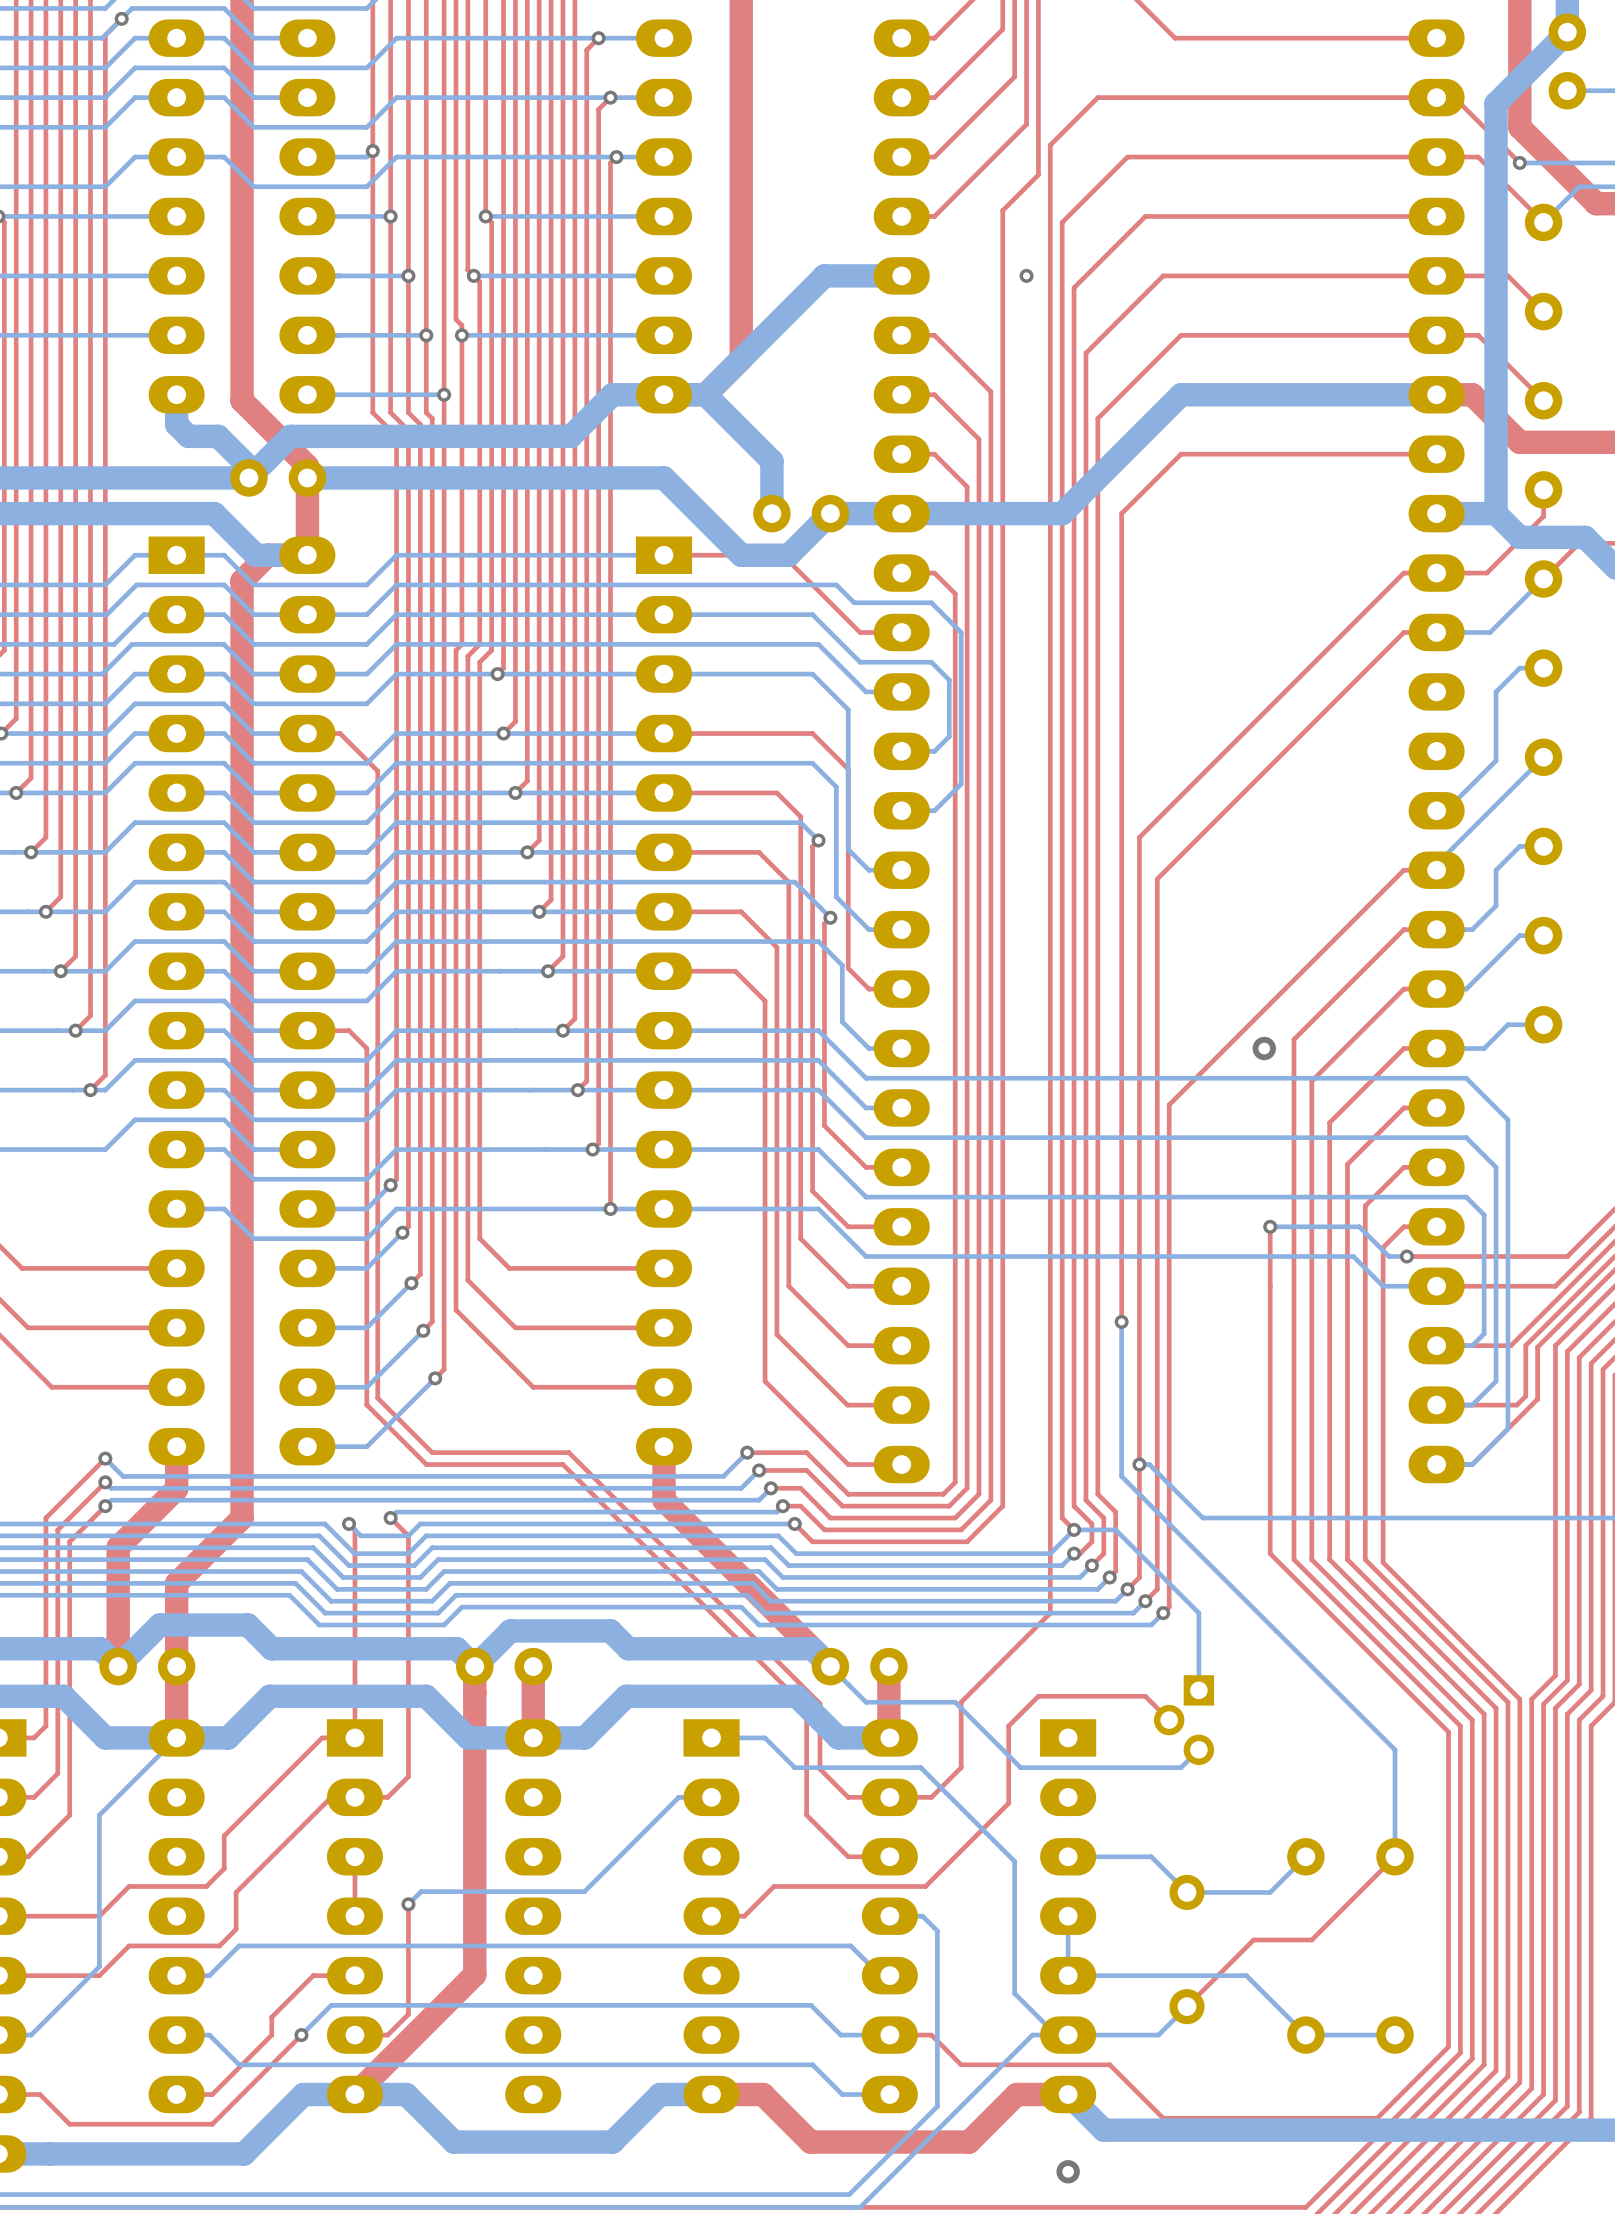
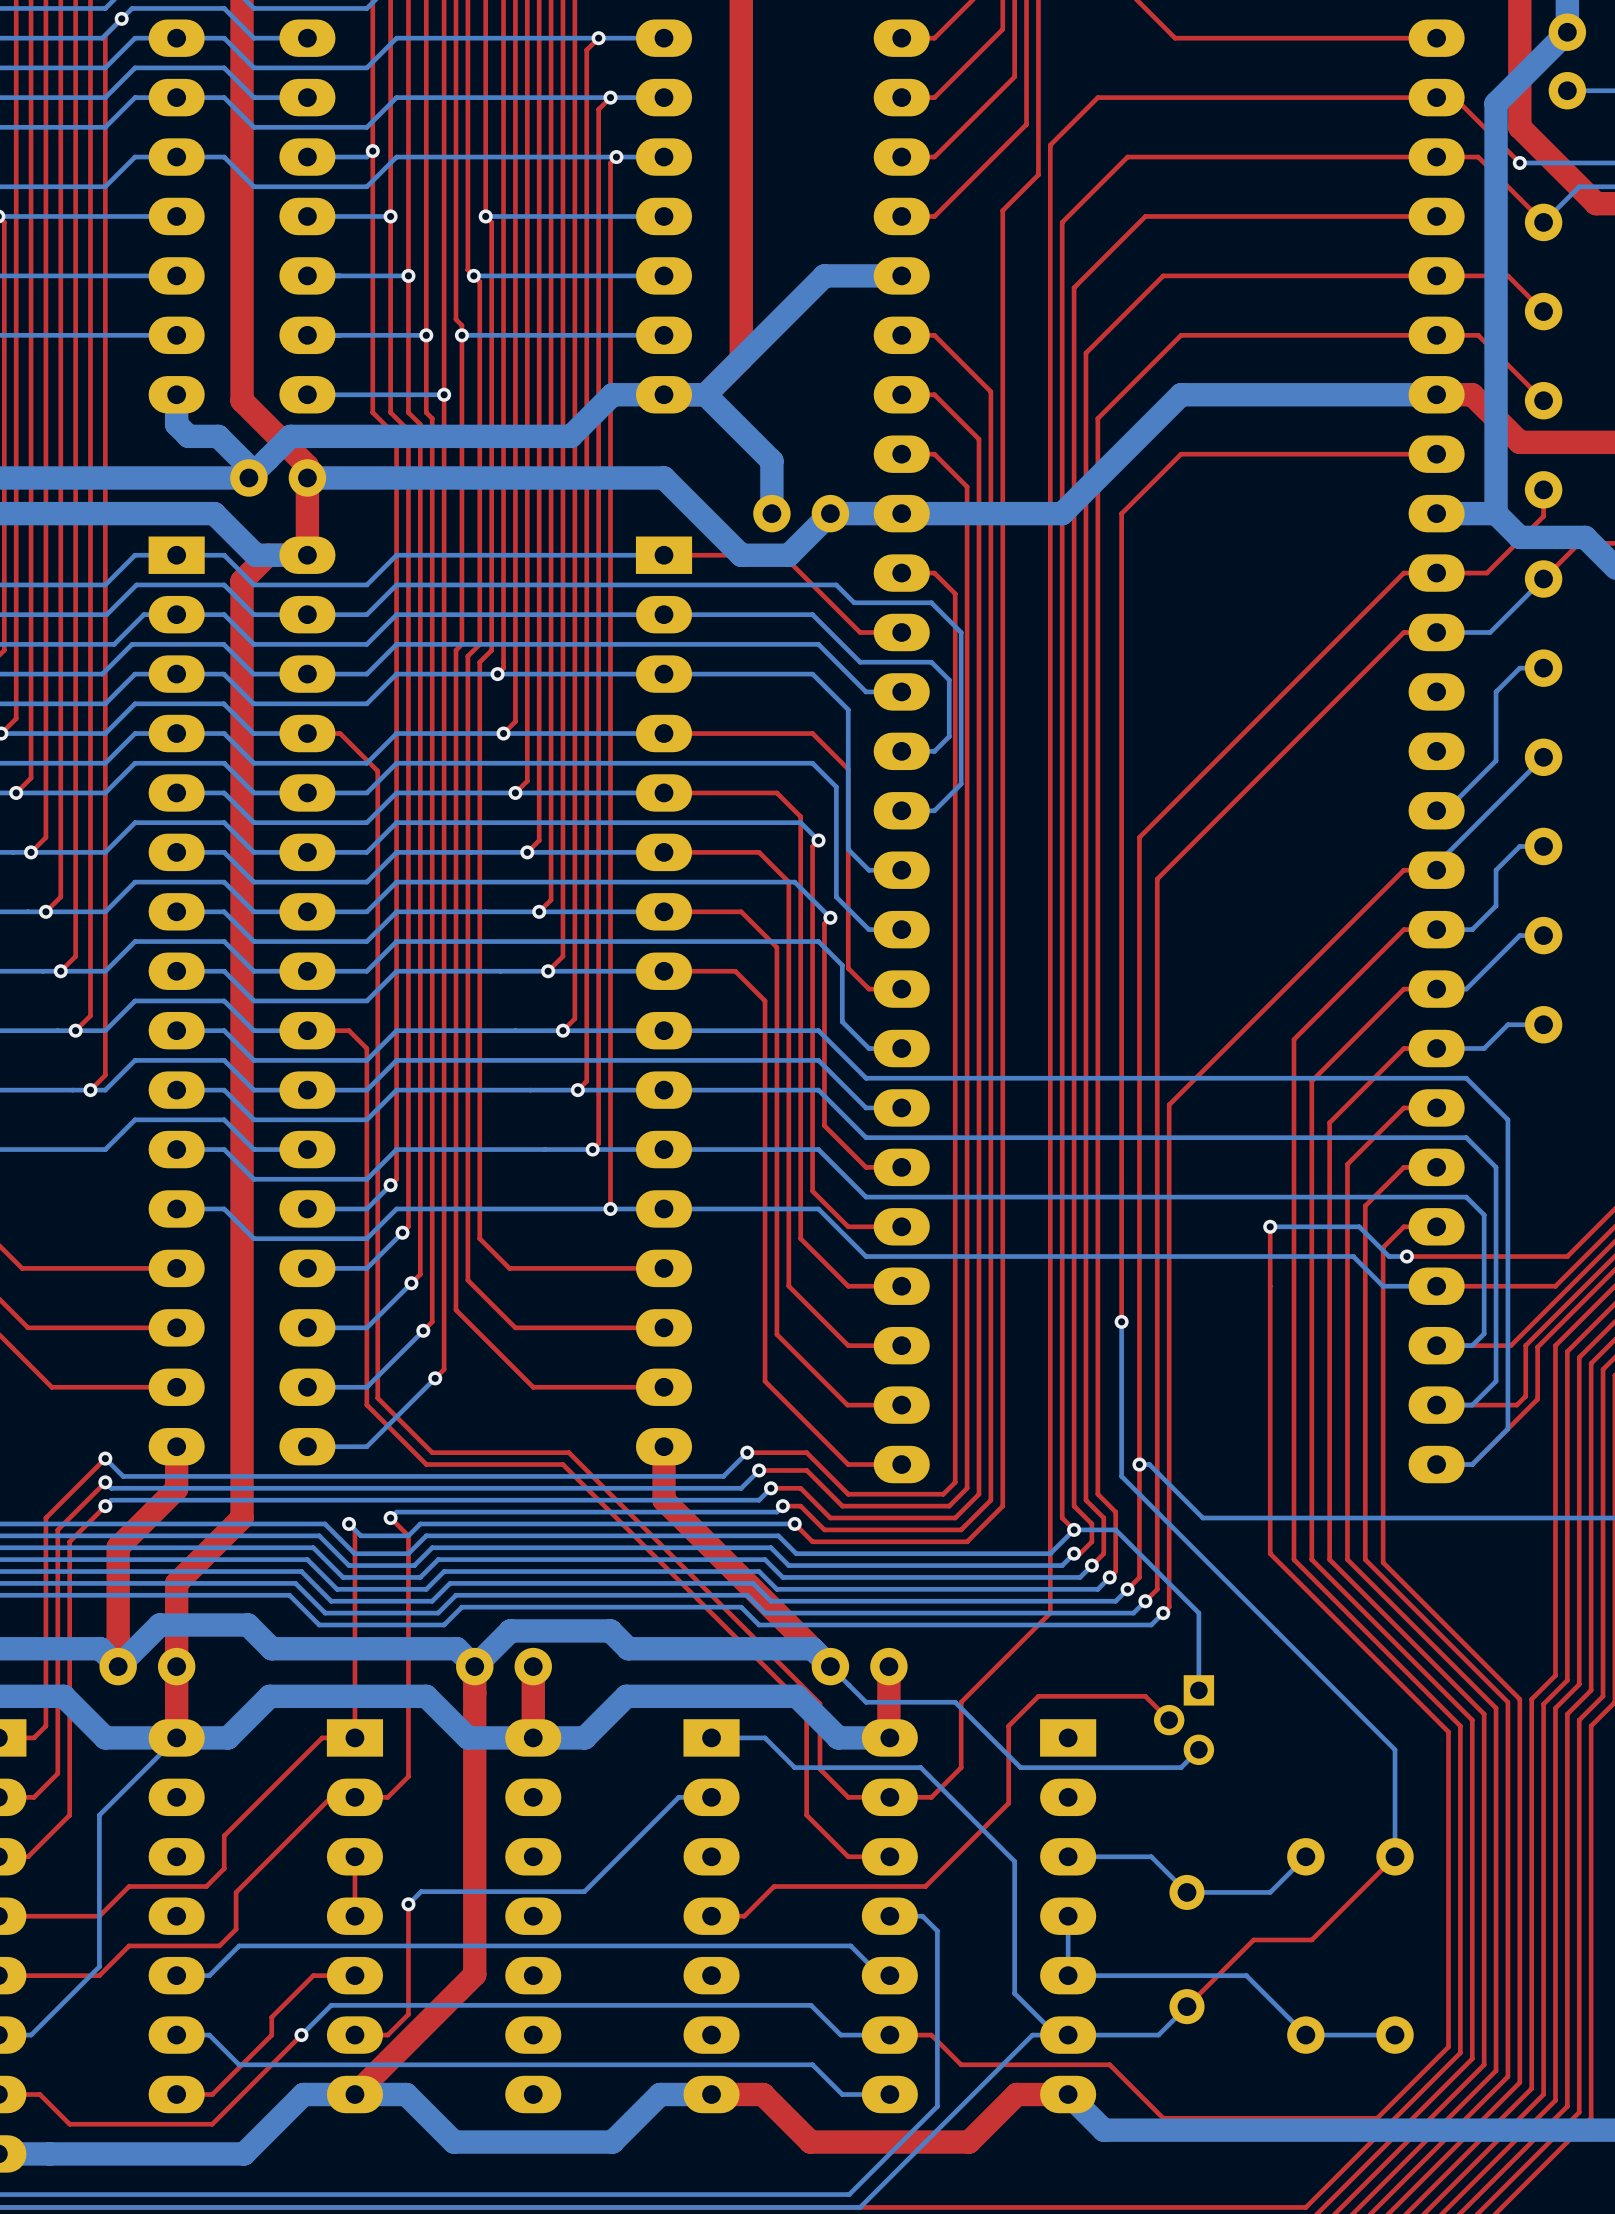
via: (1026, 275) -> none
via: (1264, 1048) -> none
via: (1068, 2171) -> none

